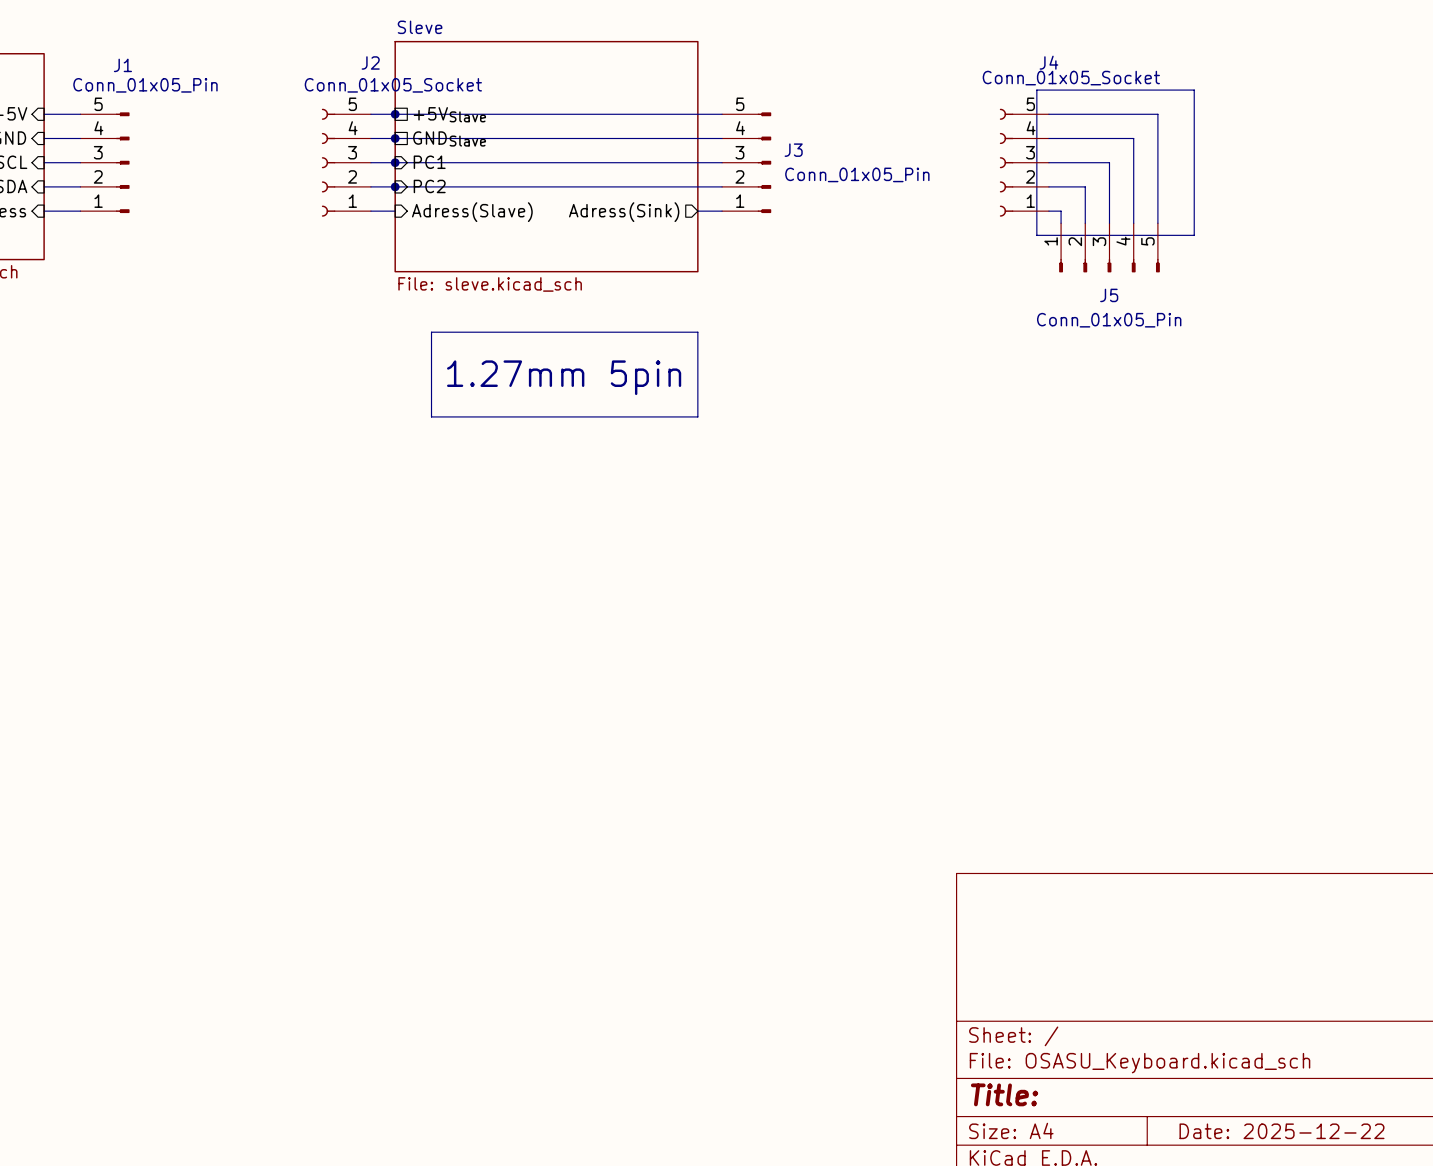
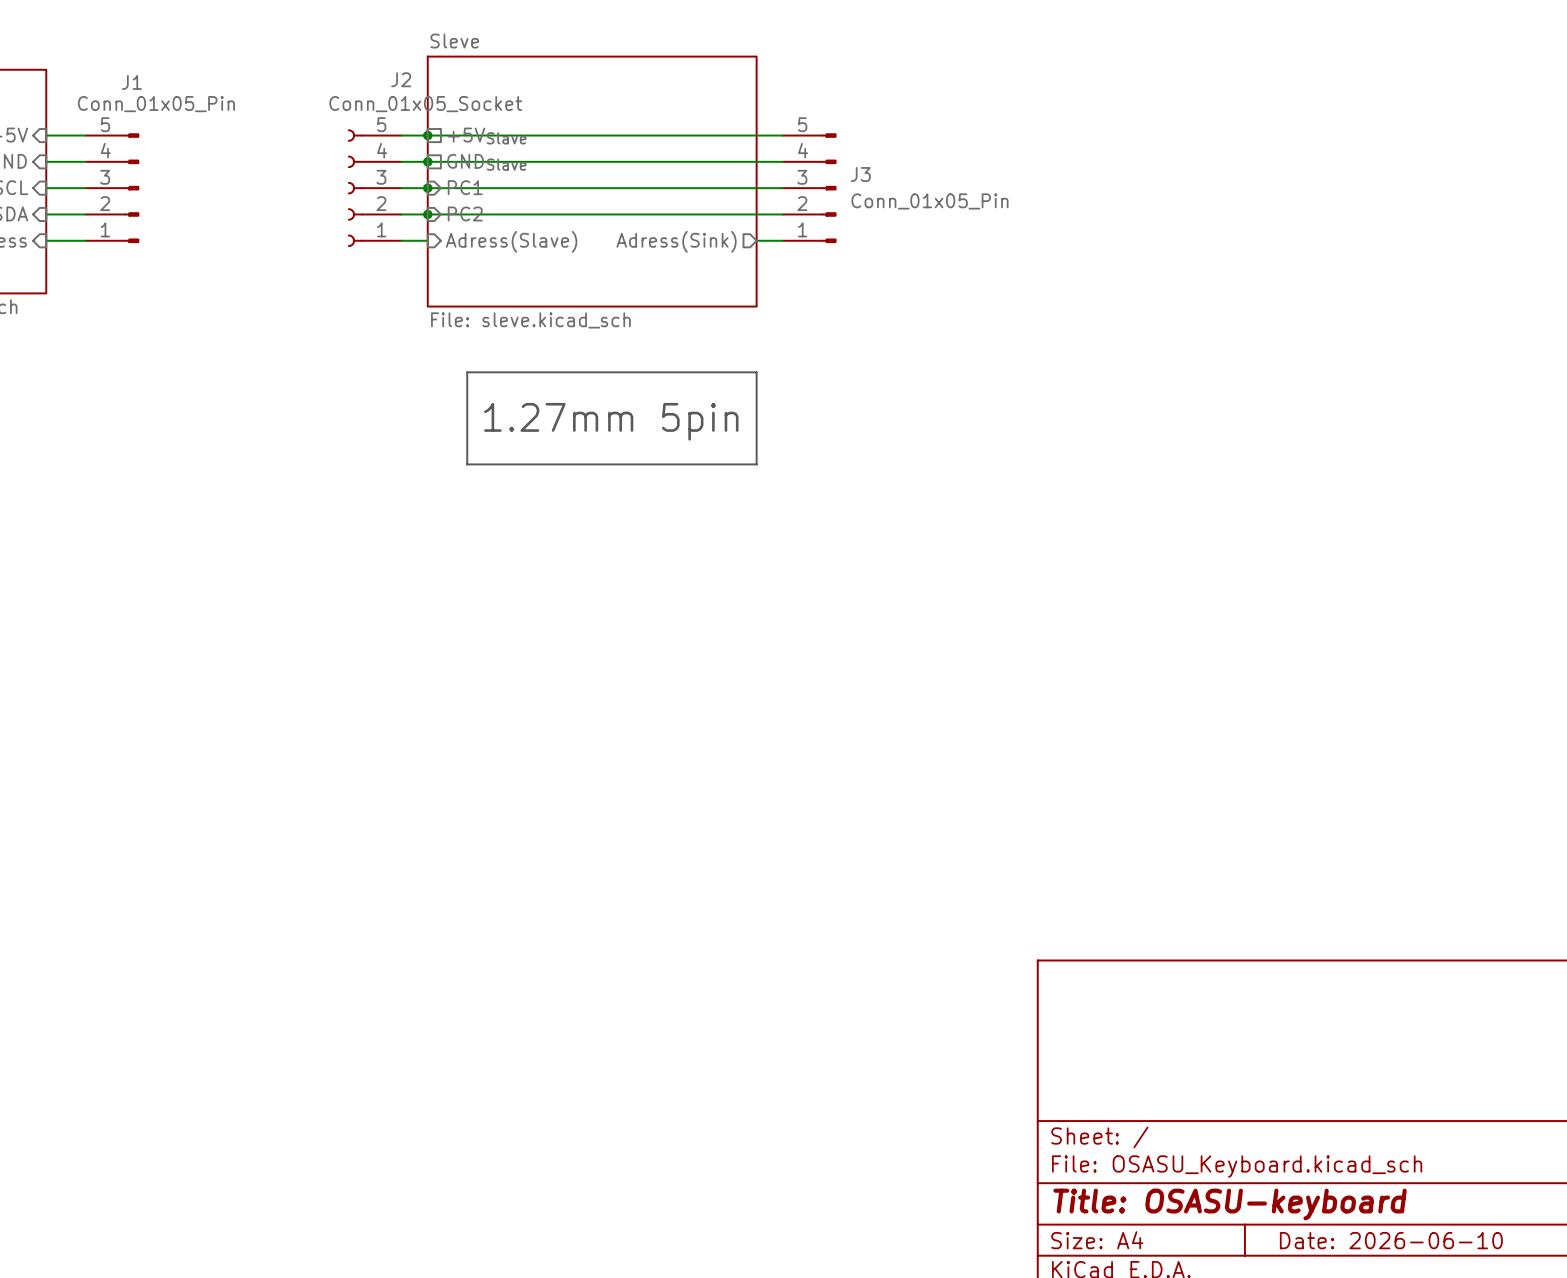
line: (1036, 90) (1194, 90) (1194, 235) (1036, 235) (1036, 90) -> none
wire: (1048, 114) (1157, 114) (1157, 223) -> none
wire: (1048, 138) (1133, 138) (1133, 223) -> none
J4: Conn_01x05_Socket (1024, 162) -> none
wire: (1048, 162) (1109, 162) (1109, 223) -> none
wire: (1048, 186) (1085, 186) (1085, 223) -> none
wire: (1048, 211) (1061, 211) (1061, 223) -> none
J5: Conn_01x05_Pin (1109, 247) -> none
title block: Title: (1004, 1094) -> Title: OSASU-keyboard (1230, 1204)
title block: Date: 2025-12-22 (1282, 1131) -> Date: 2026-06-10 (1391, 1240)

